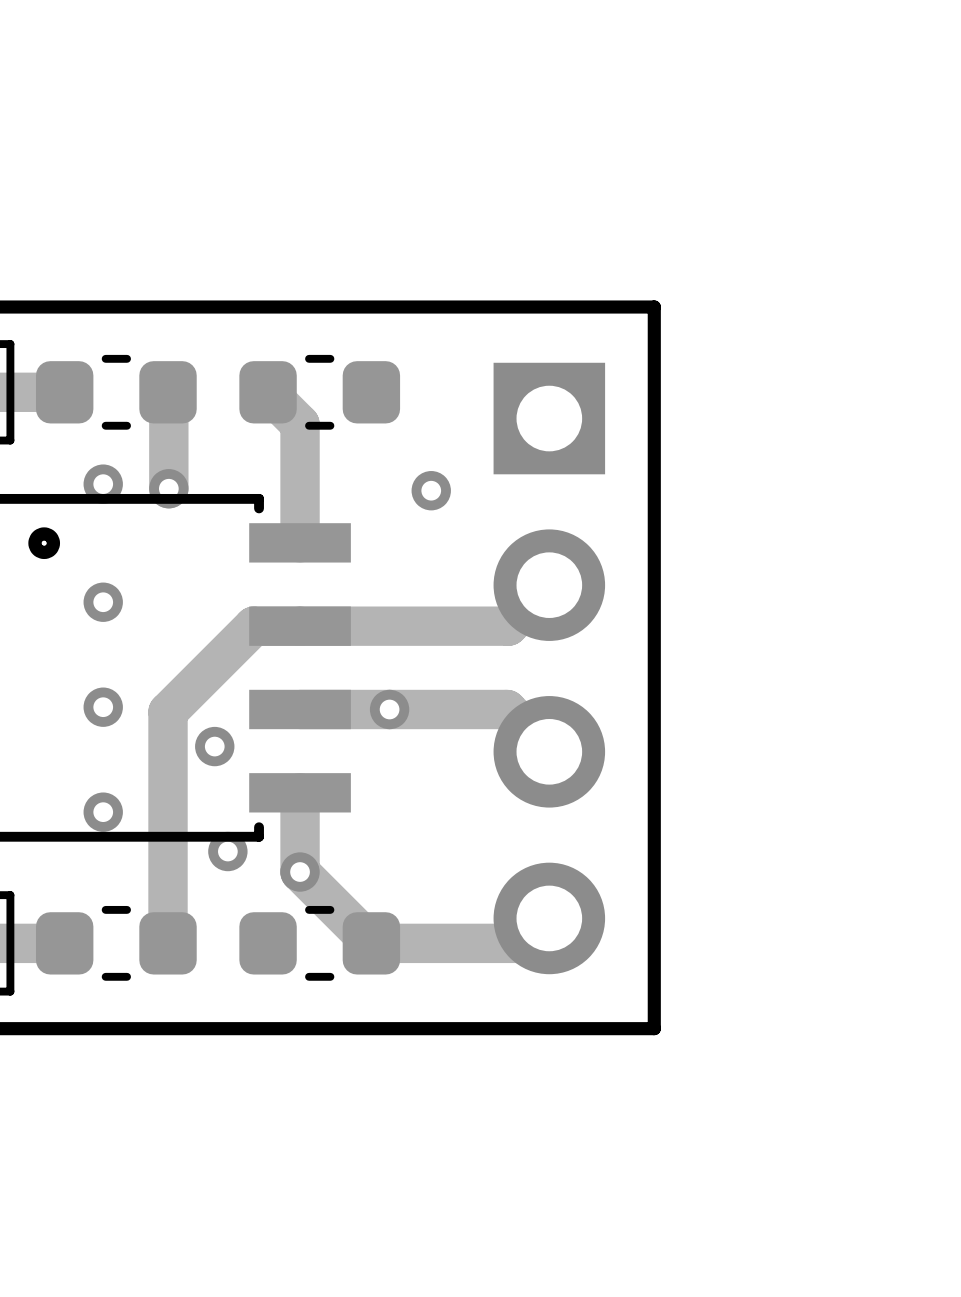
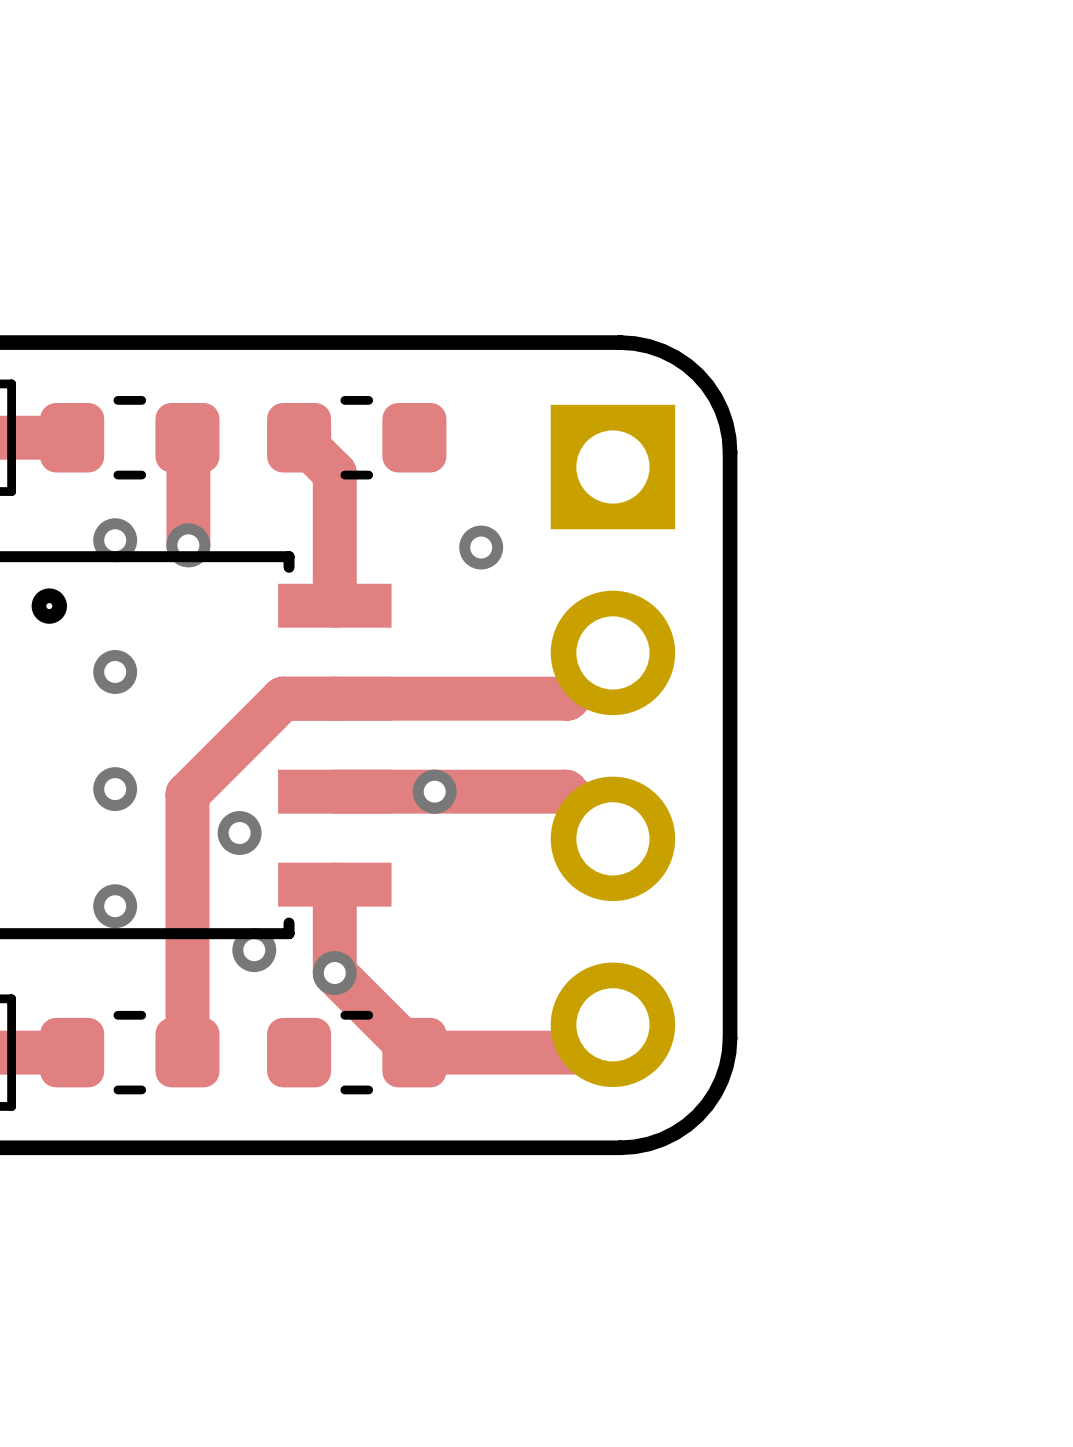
board edge: (555, 307) (654, 307) (654, 405) -> (620, 342) (634, 343) (662, 350) (687, 365) (697, 374) (707, 385) (721, 410) (726, 423) (730, 452)
board edge: (654, 930) (654, 1028) (555, 1028) -> (730, 1037) (726, 1066) (721, 1080) (707, 1104) (697, 1115) (687, 1125) (662, 1139) (634, 1146) (620, 1147)

